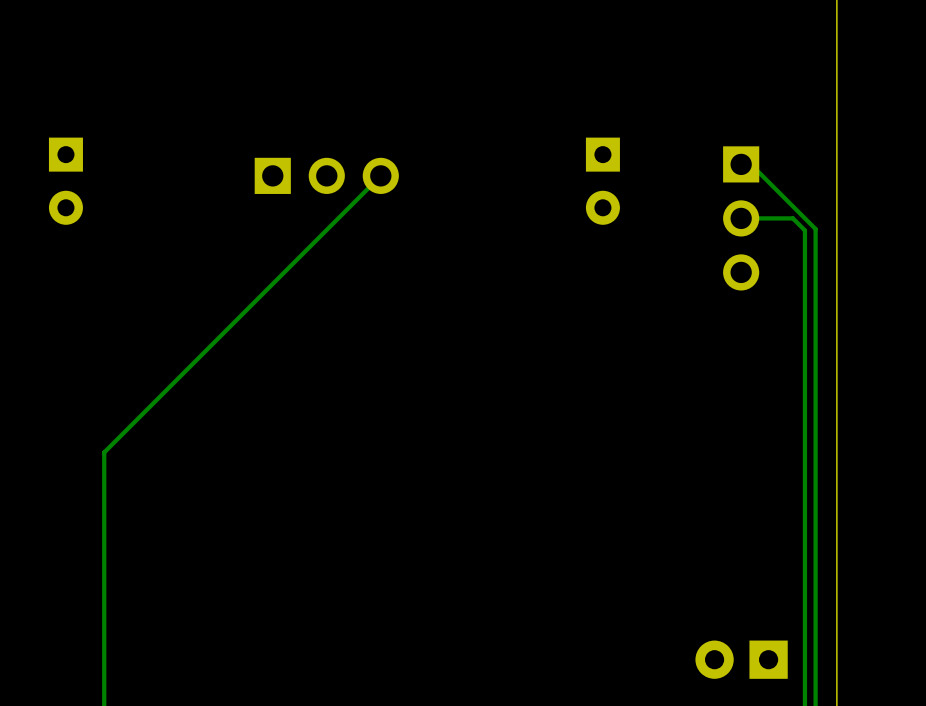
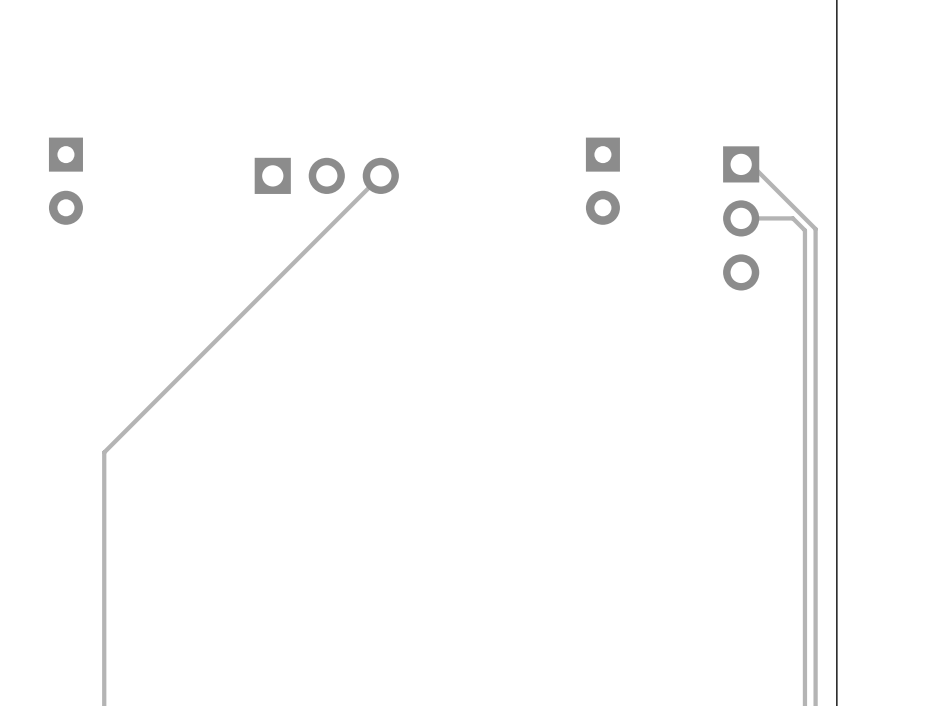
part: (741, 659) -> none

